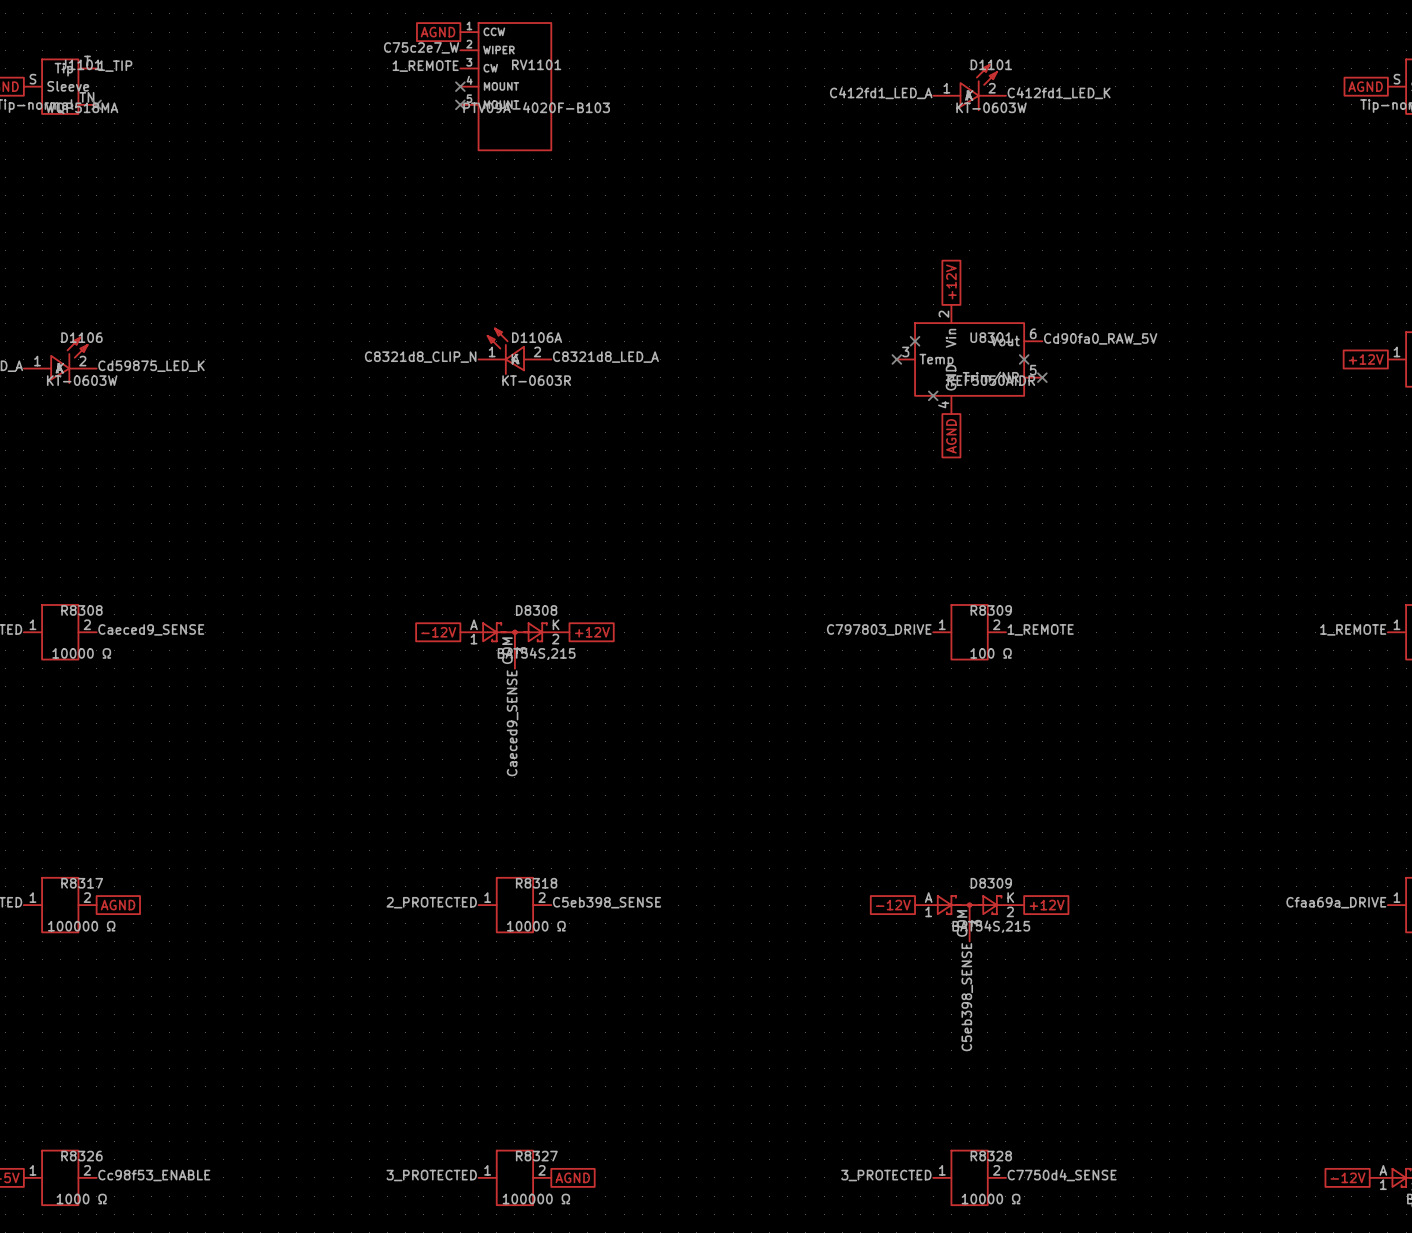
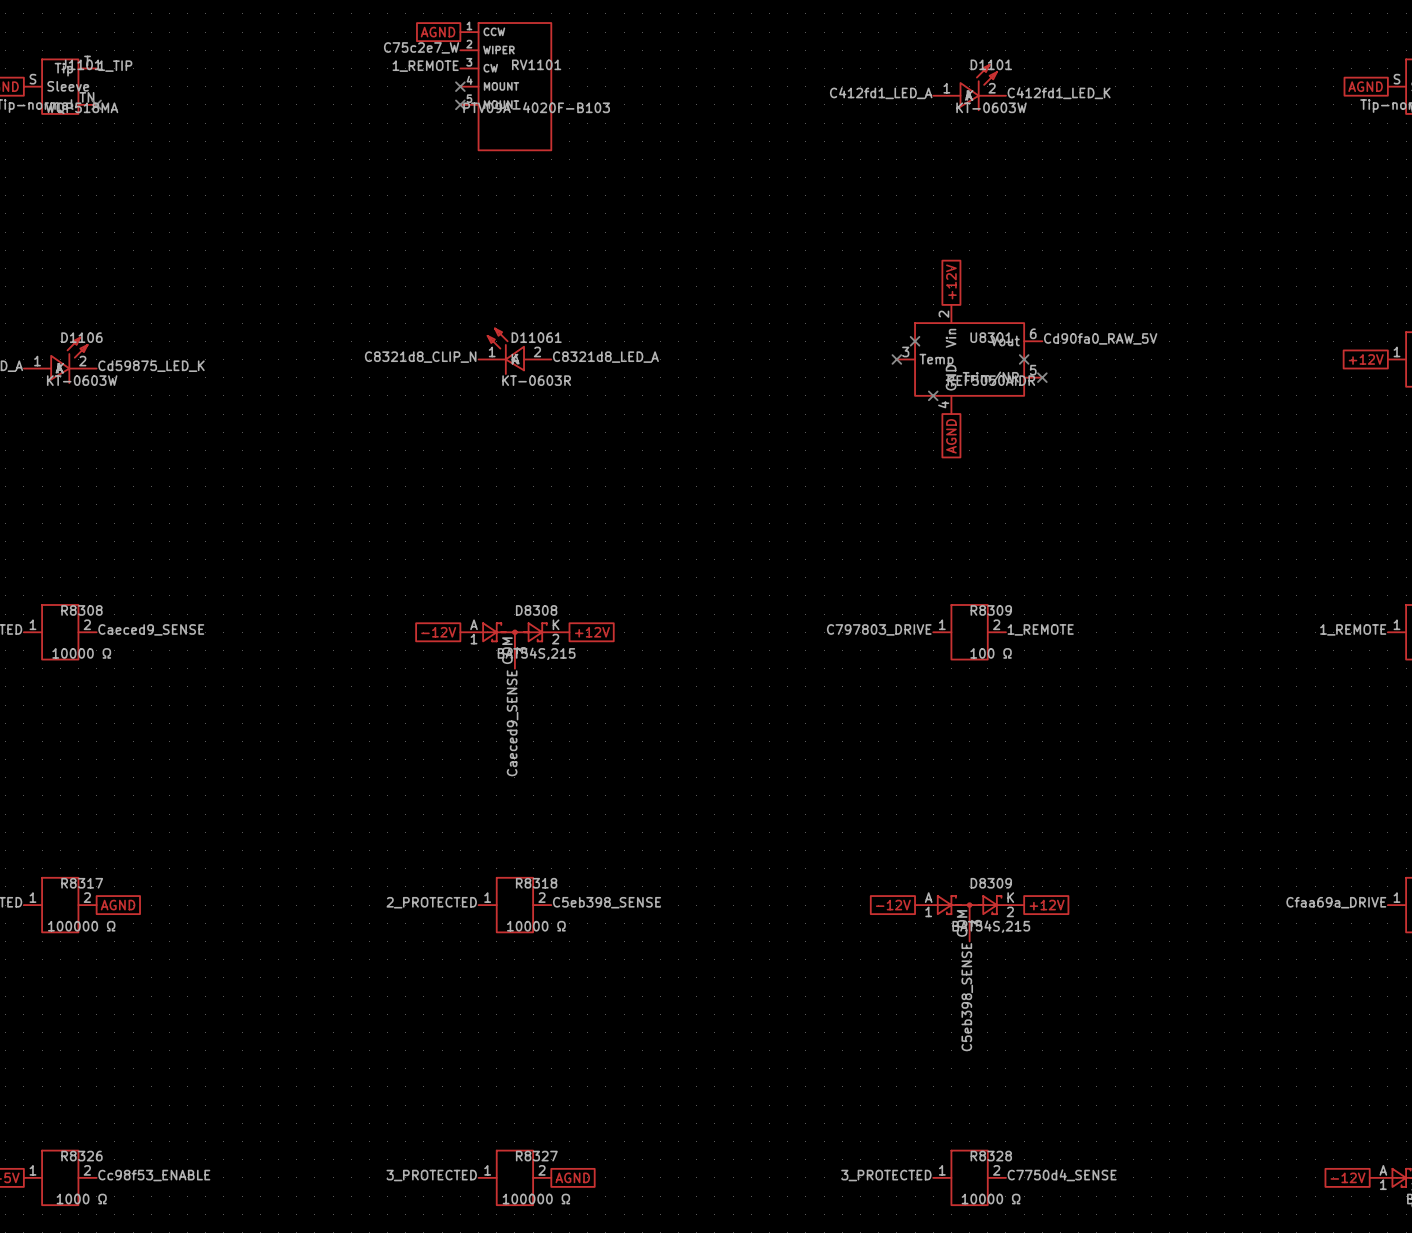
D1106A name: D1106A (537, 337) -> D11061 (536, 337)

